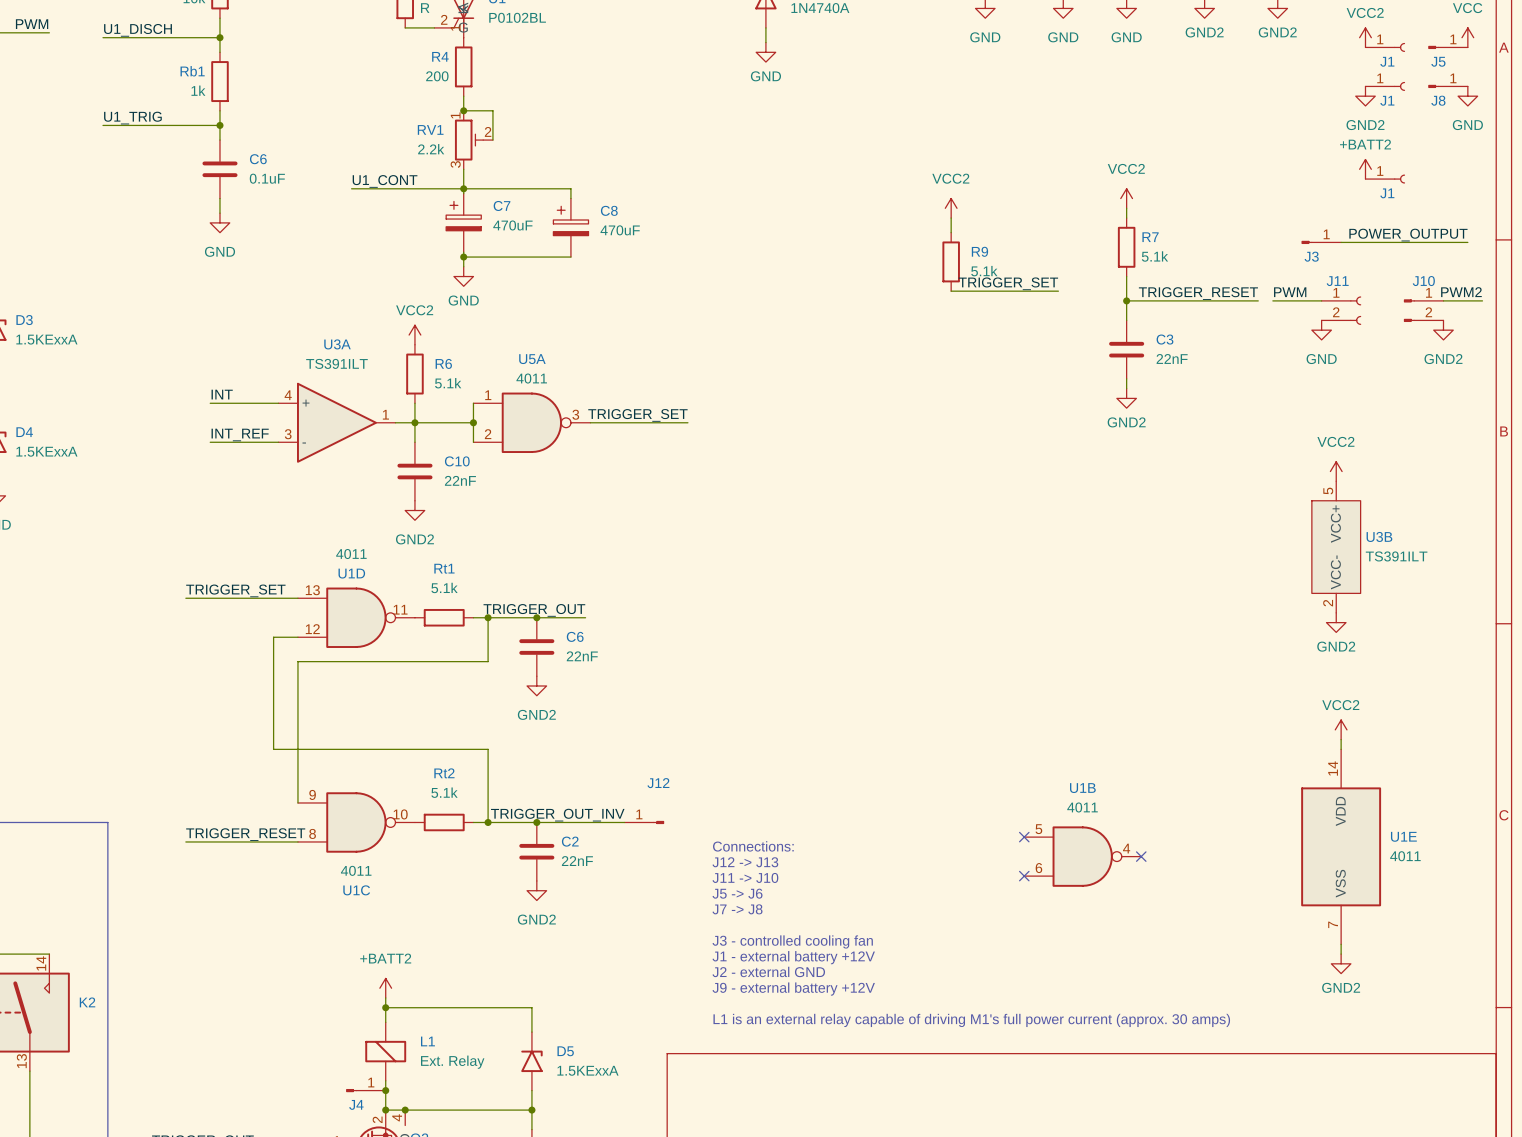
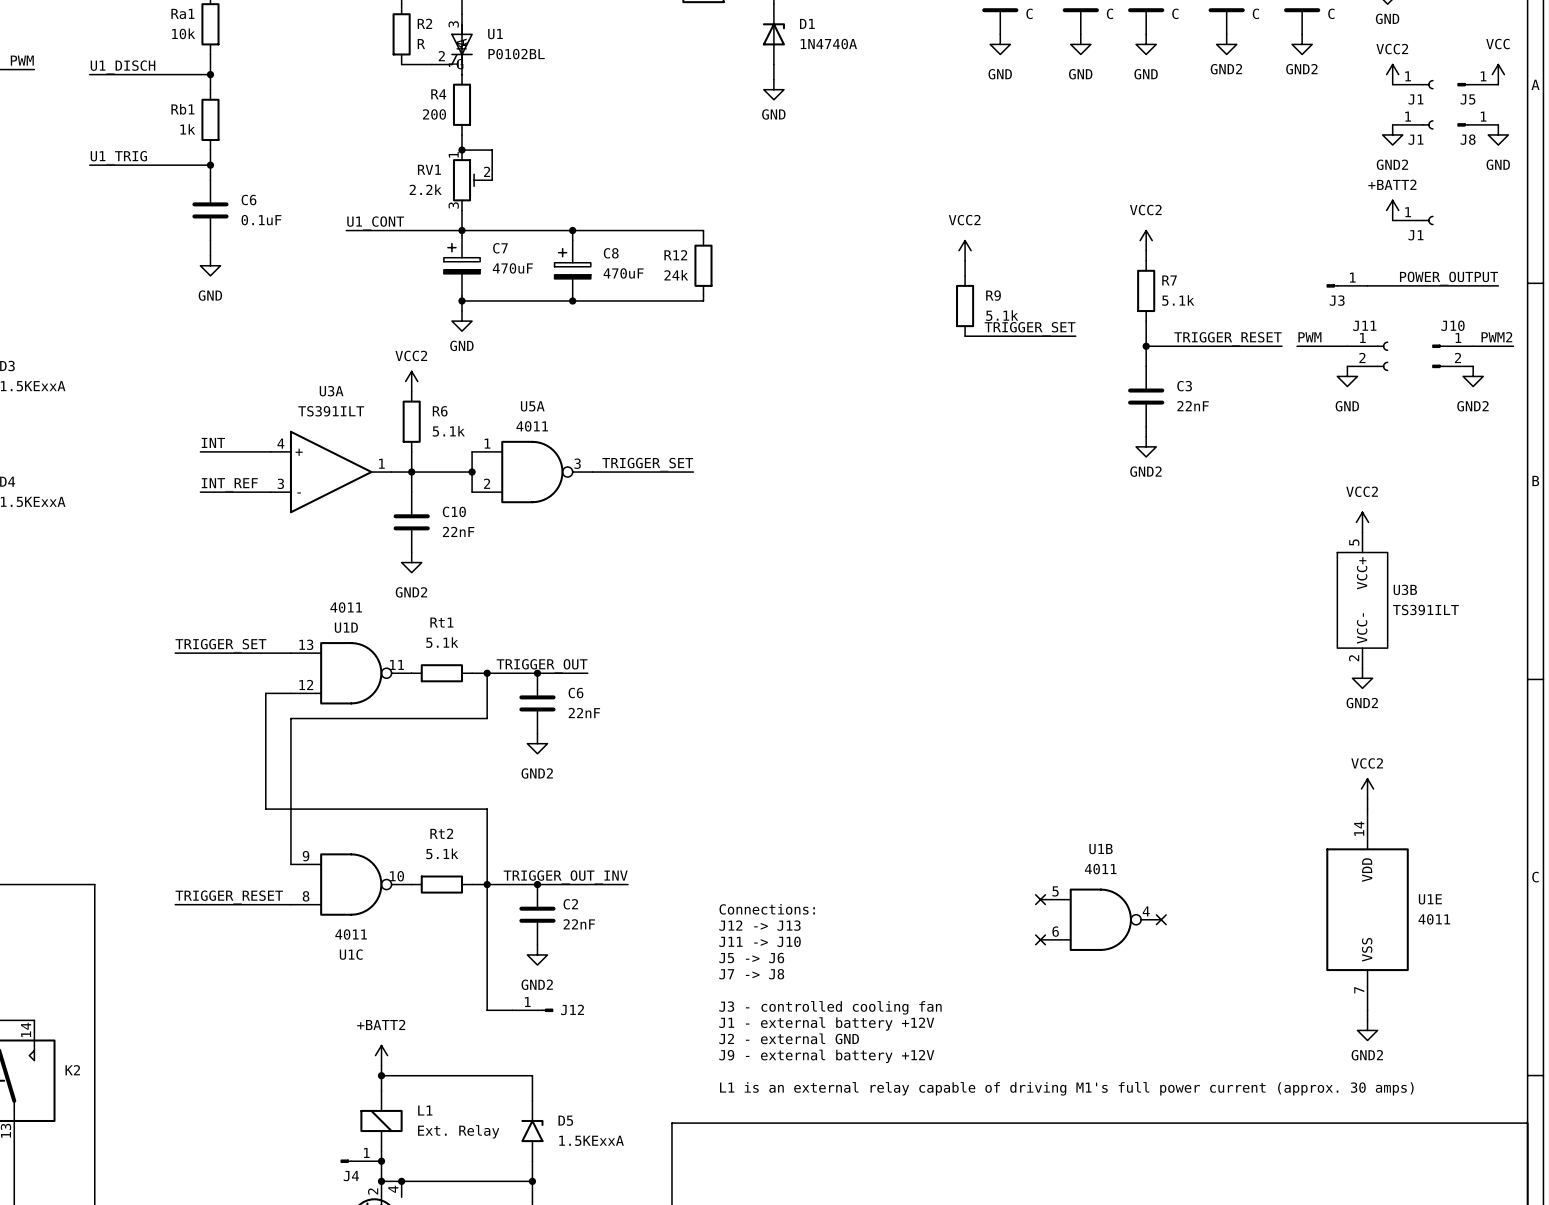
wire: none -> (572, 230) (703, 230) (703, 235)
junction: none -> (572, 230)
R12: none -> 24k (703, 265)
wire: none -> (703, 295) (703, 300) (572, 300)
junction: none -> (572, 300)
J12 name position: J12 (658, 783) -> J12 (572, 1009)
wire: none -> (487, 884) (487, 1010) (512, 1010)
J12 position: (644, 822) -> (532, 1010)

